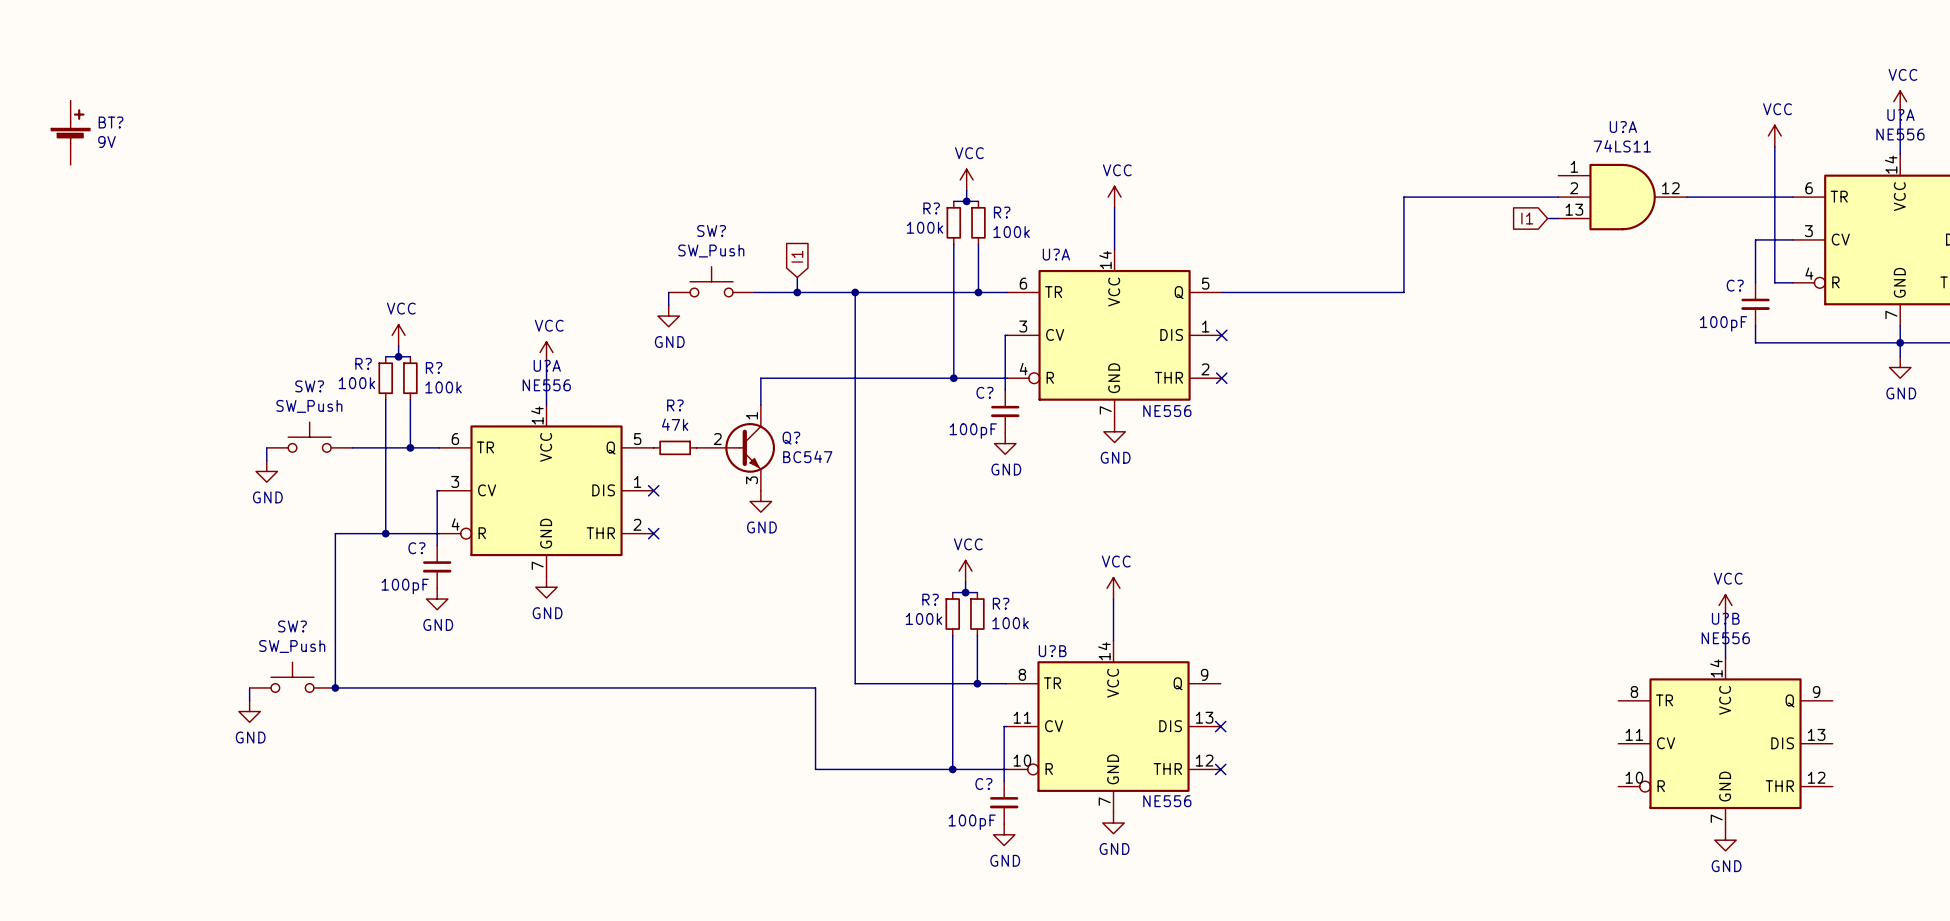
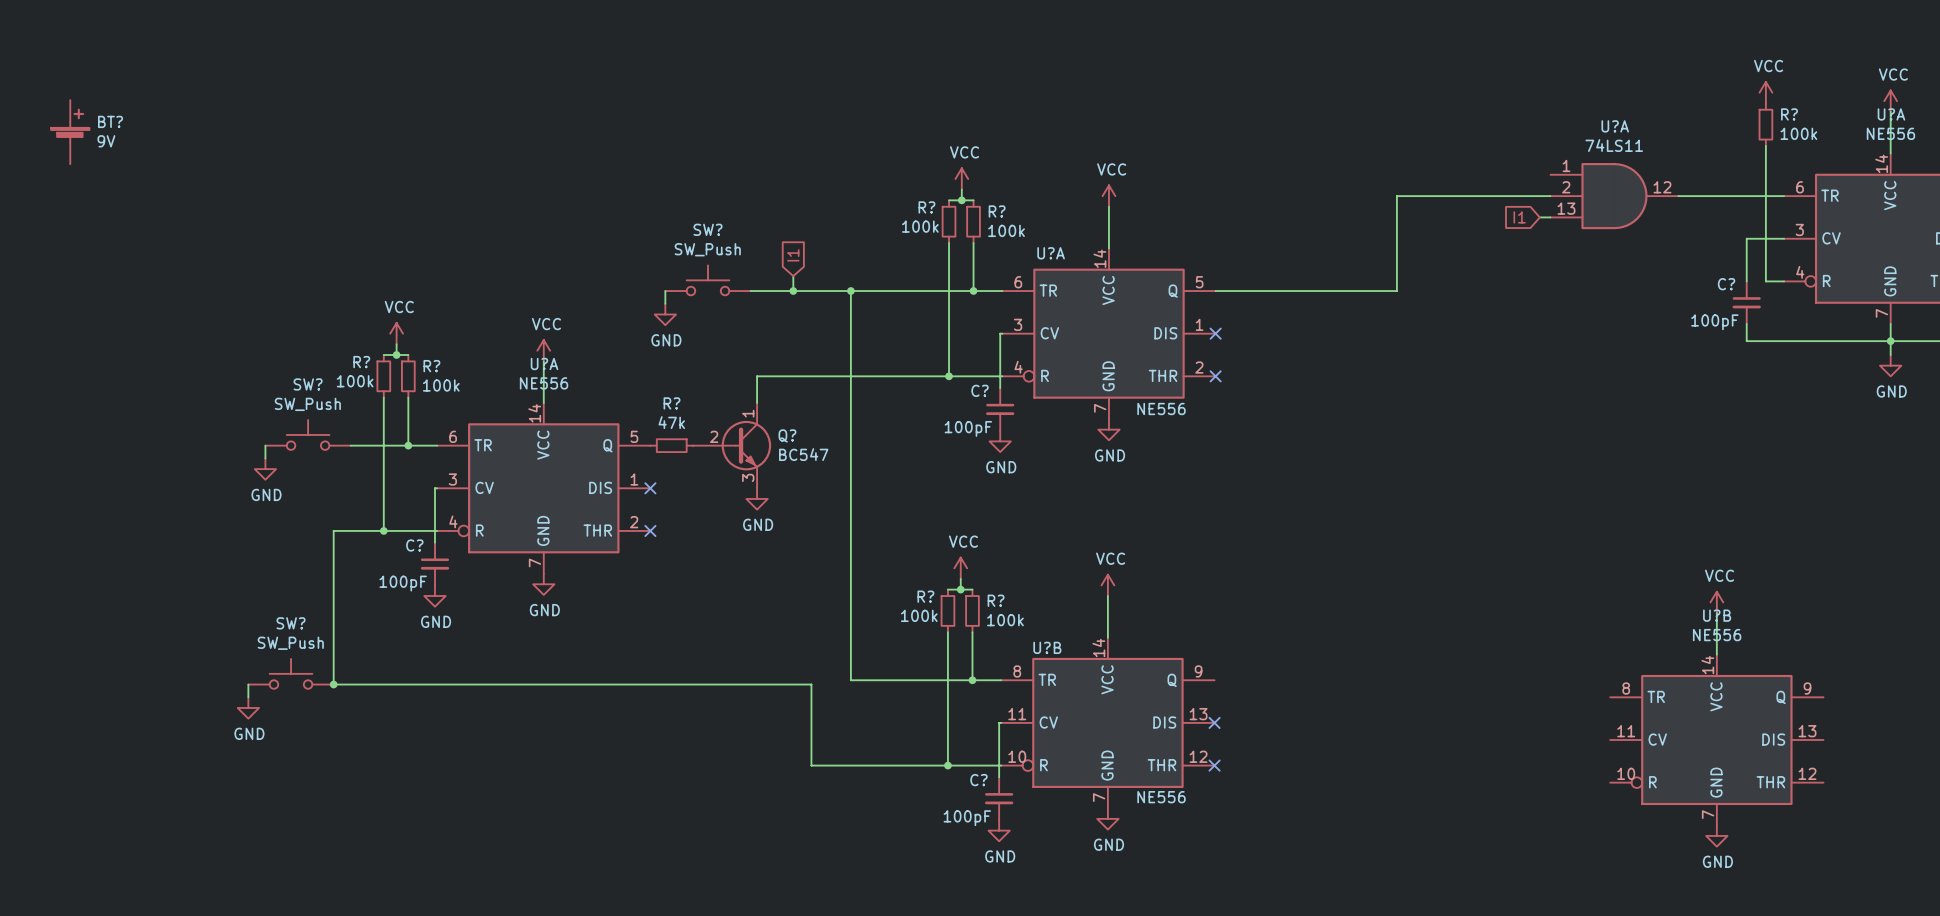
R?: none -> 100k (1765, 124)
power symbol position: VCC (1774, 135) -> VCC (1765, 92)

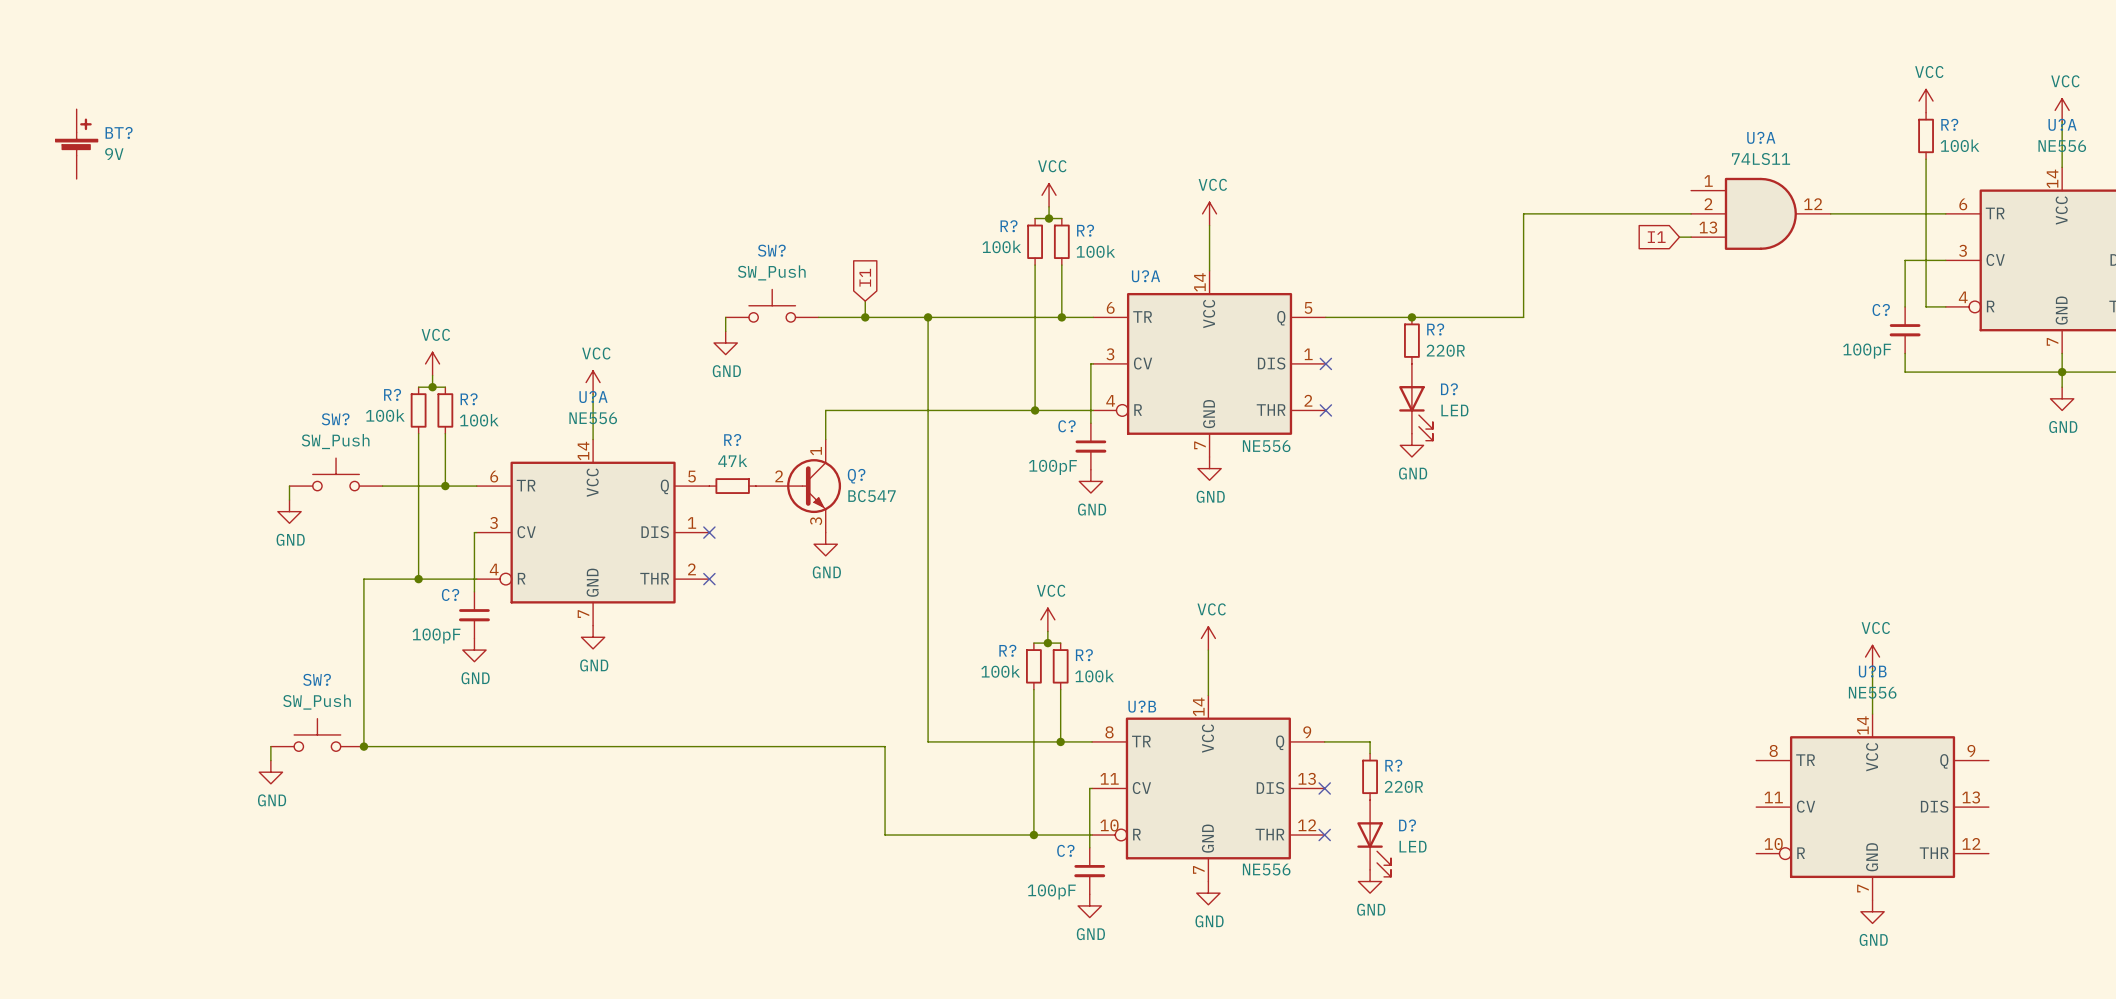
junction: none -> (1411, 317)
R?: none -> 220R (1411, 340)
D?: none -> LED (1416, 402)
power symbol: none -> GND (1411, 445)
wire: none -> (1324, 741) (1370, 741) (1370, 753)
R?: none -> 220R (1370, 776)
D?: none -> LED (1374, 838)
power symbol: none -> GND (1370, 881)

